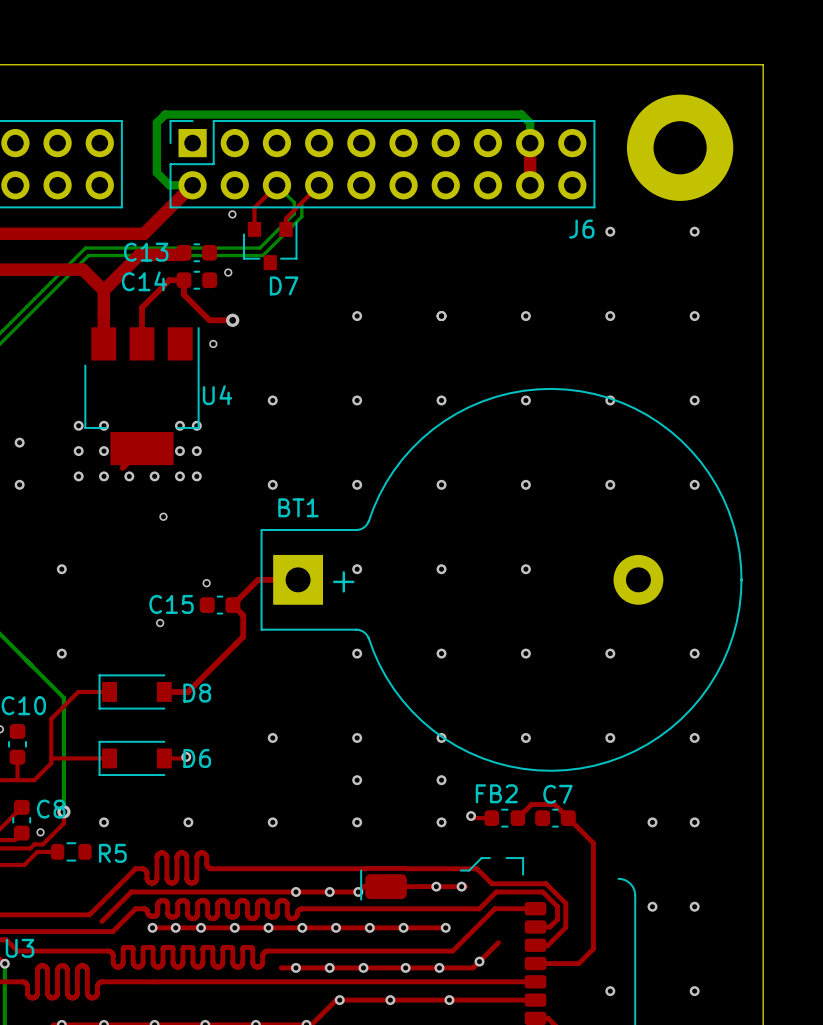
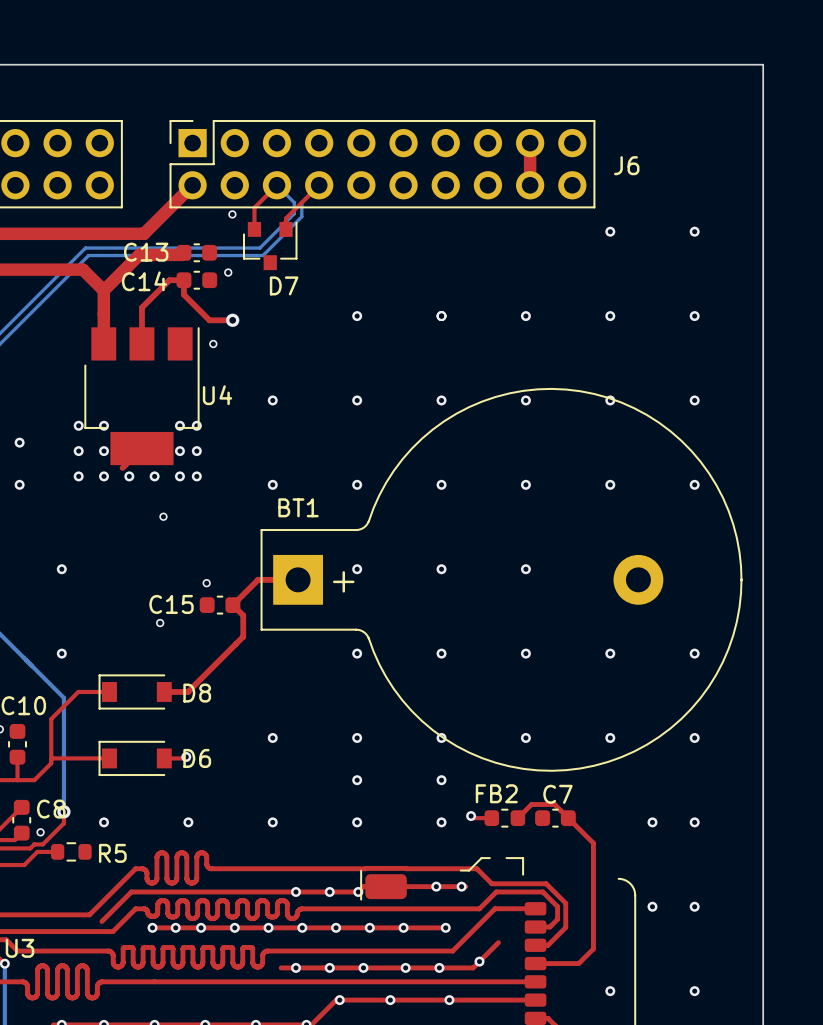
bottom track: (530, 143) (530, 123) (521, 114) (165, 114) (156, 122) (156, 172) (169, 185) (192, 185) -> none
part: (680, 147) -> none
J6 name position: J6 (581, 229) -> J6 (626, 165)

